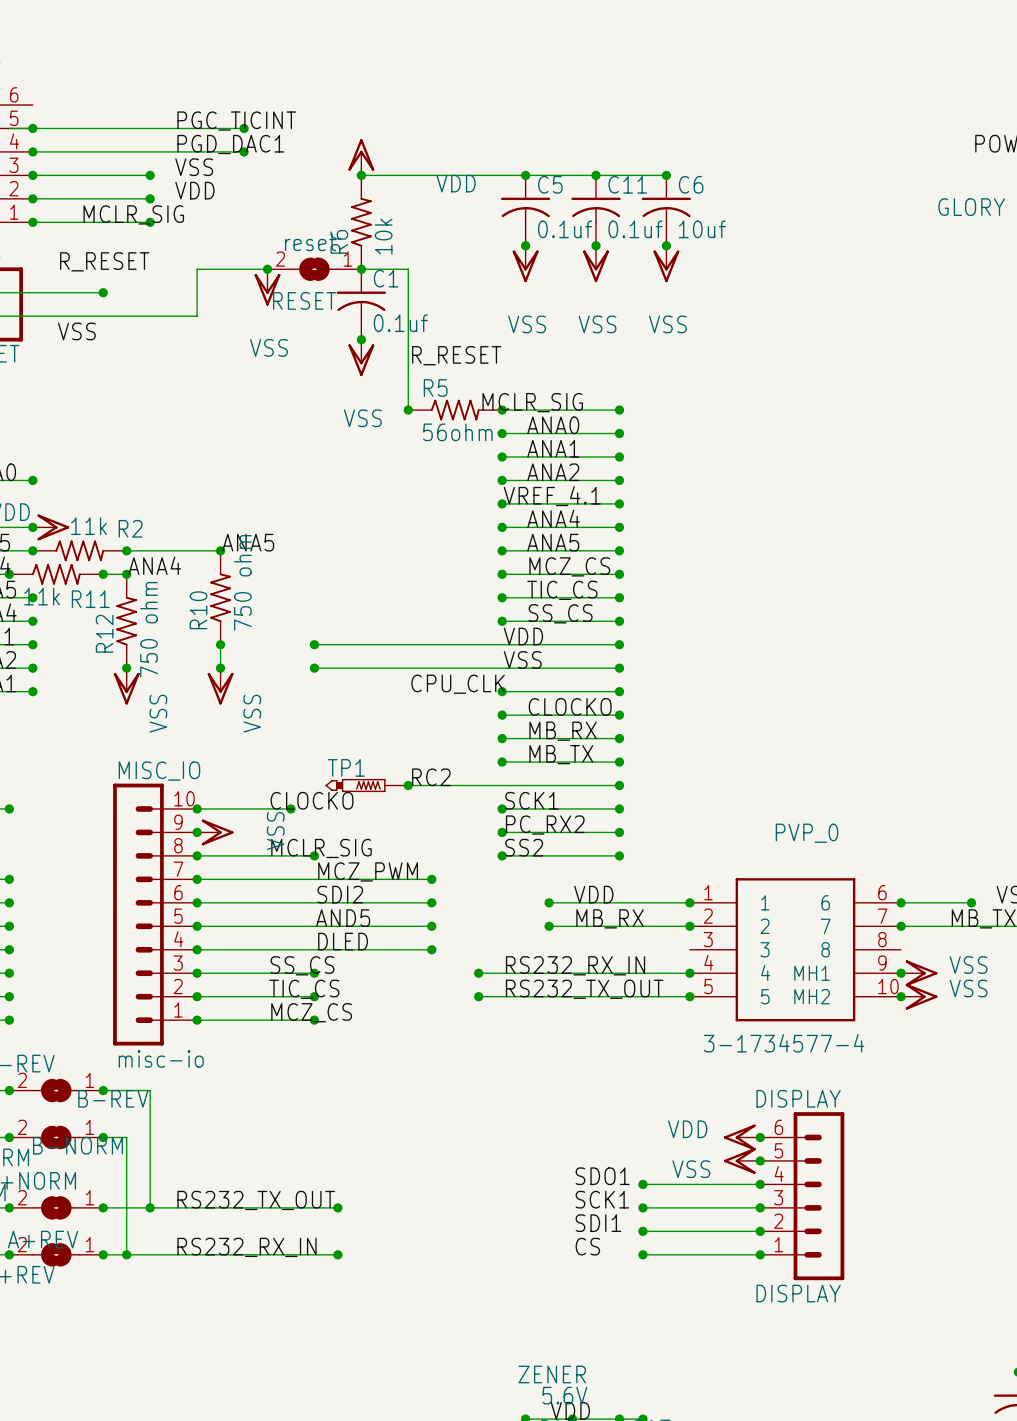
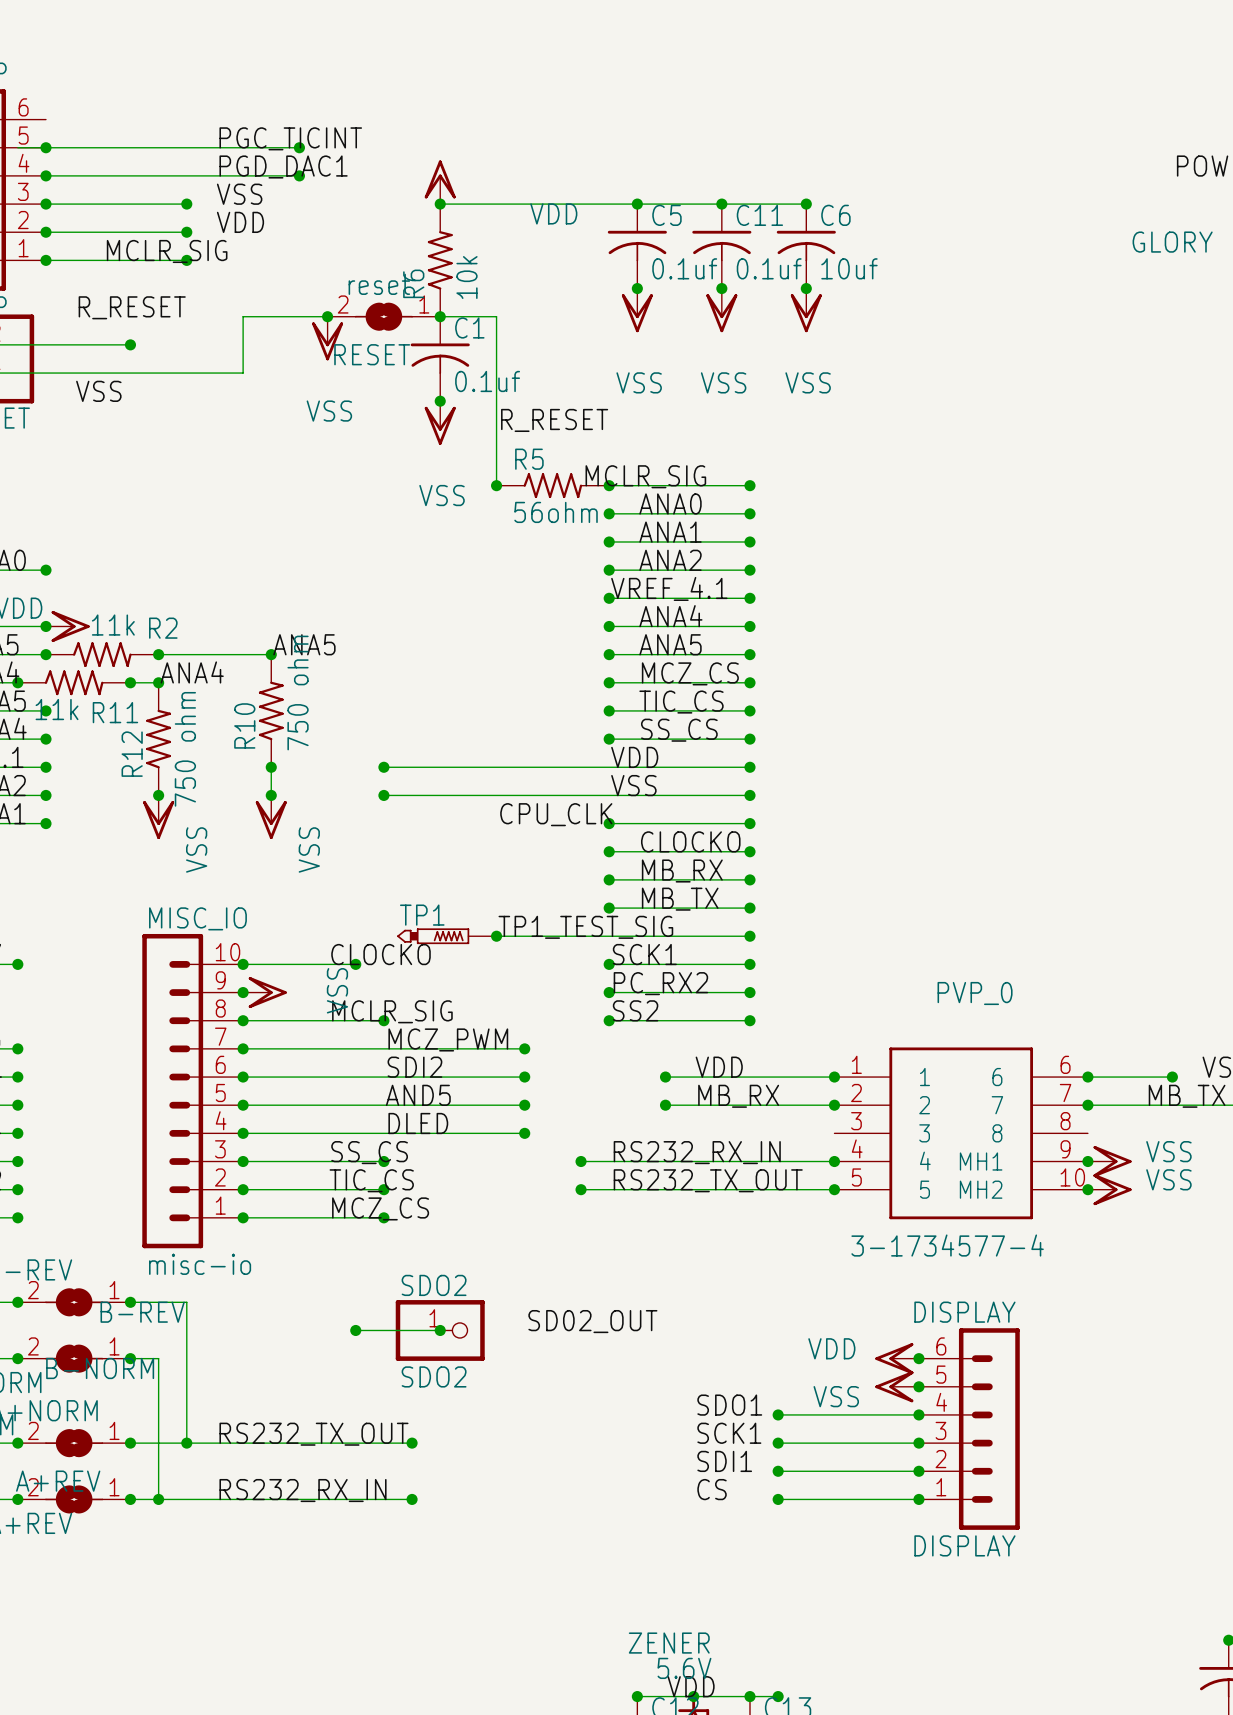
label: RC2 (431, 777) -> TP1_TEST_SIG (585, 927)
label: none -> SD02_OUT (592, 1321)
wire: none -> (355, 1330) (440, 1330)
junction: none -> (355, 1330)
SDO2: none -> SDO2 (440, 1330)
junction: none -> (440, 1330)

